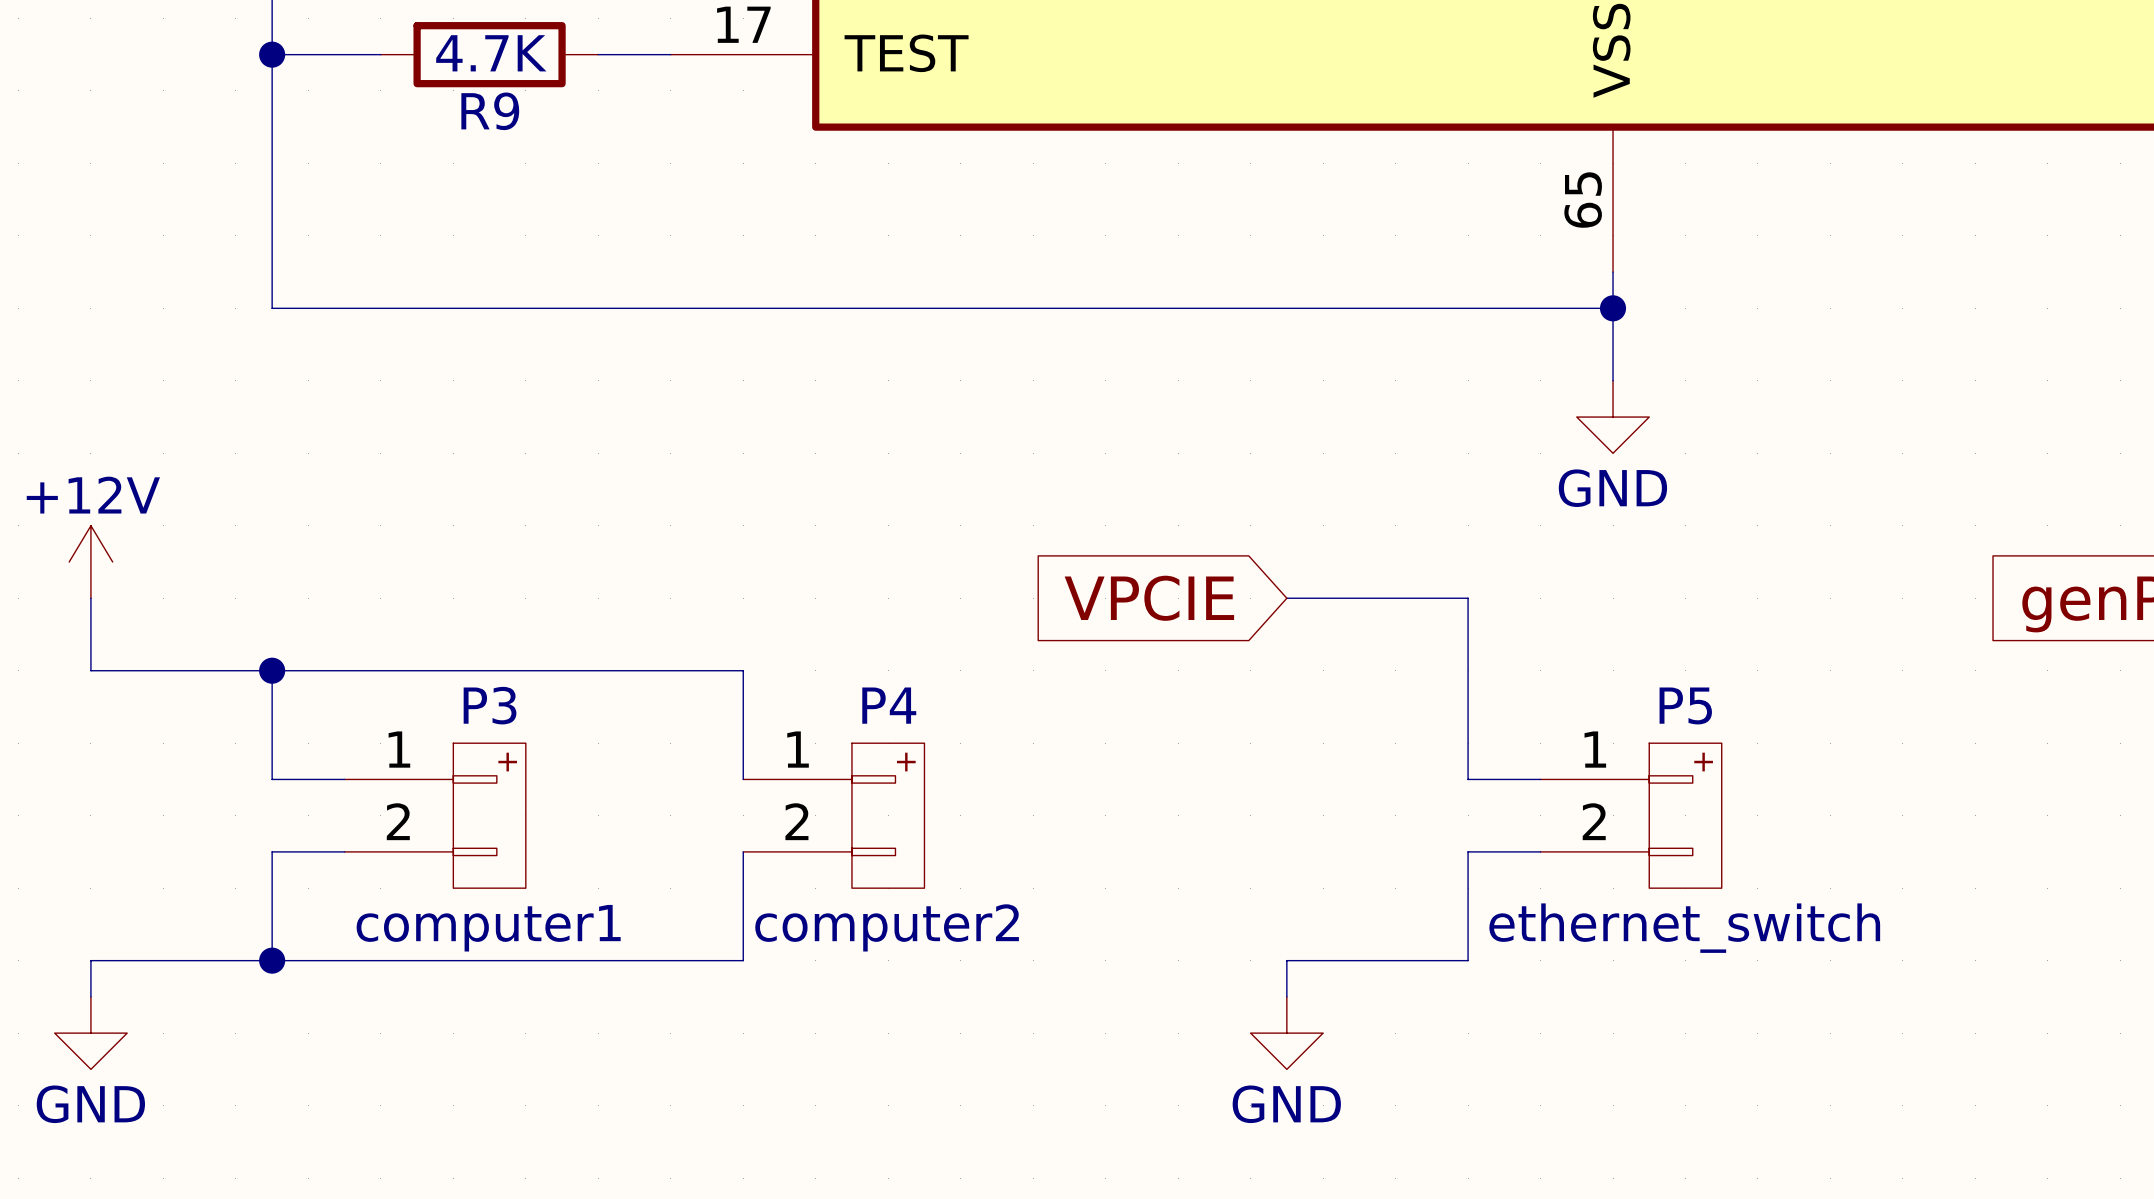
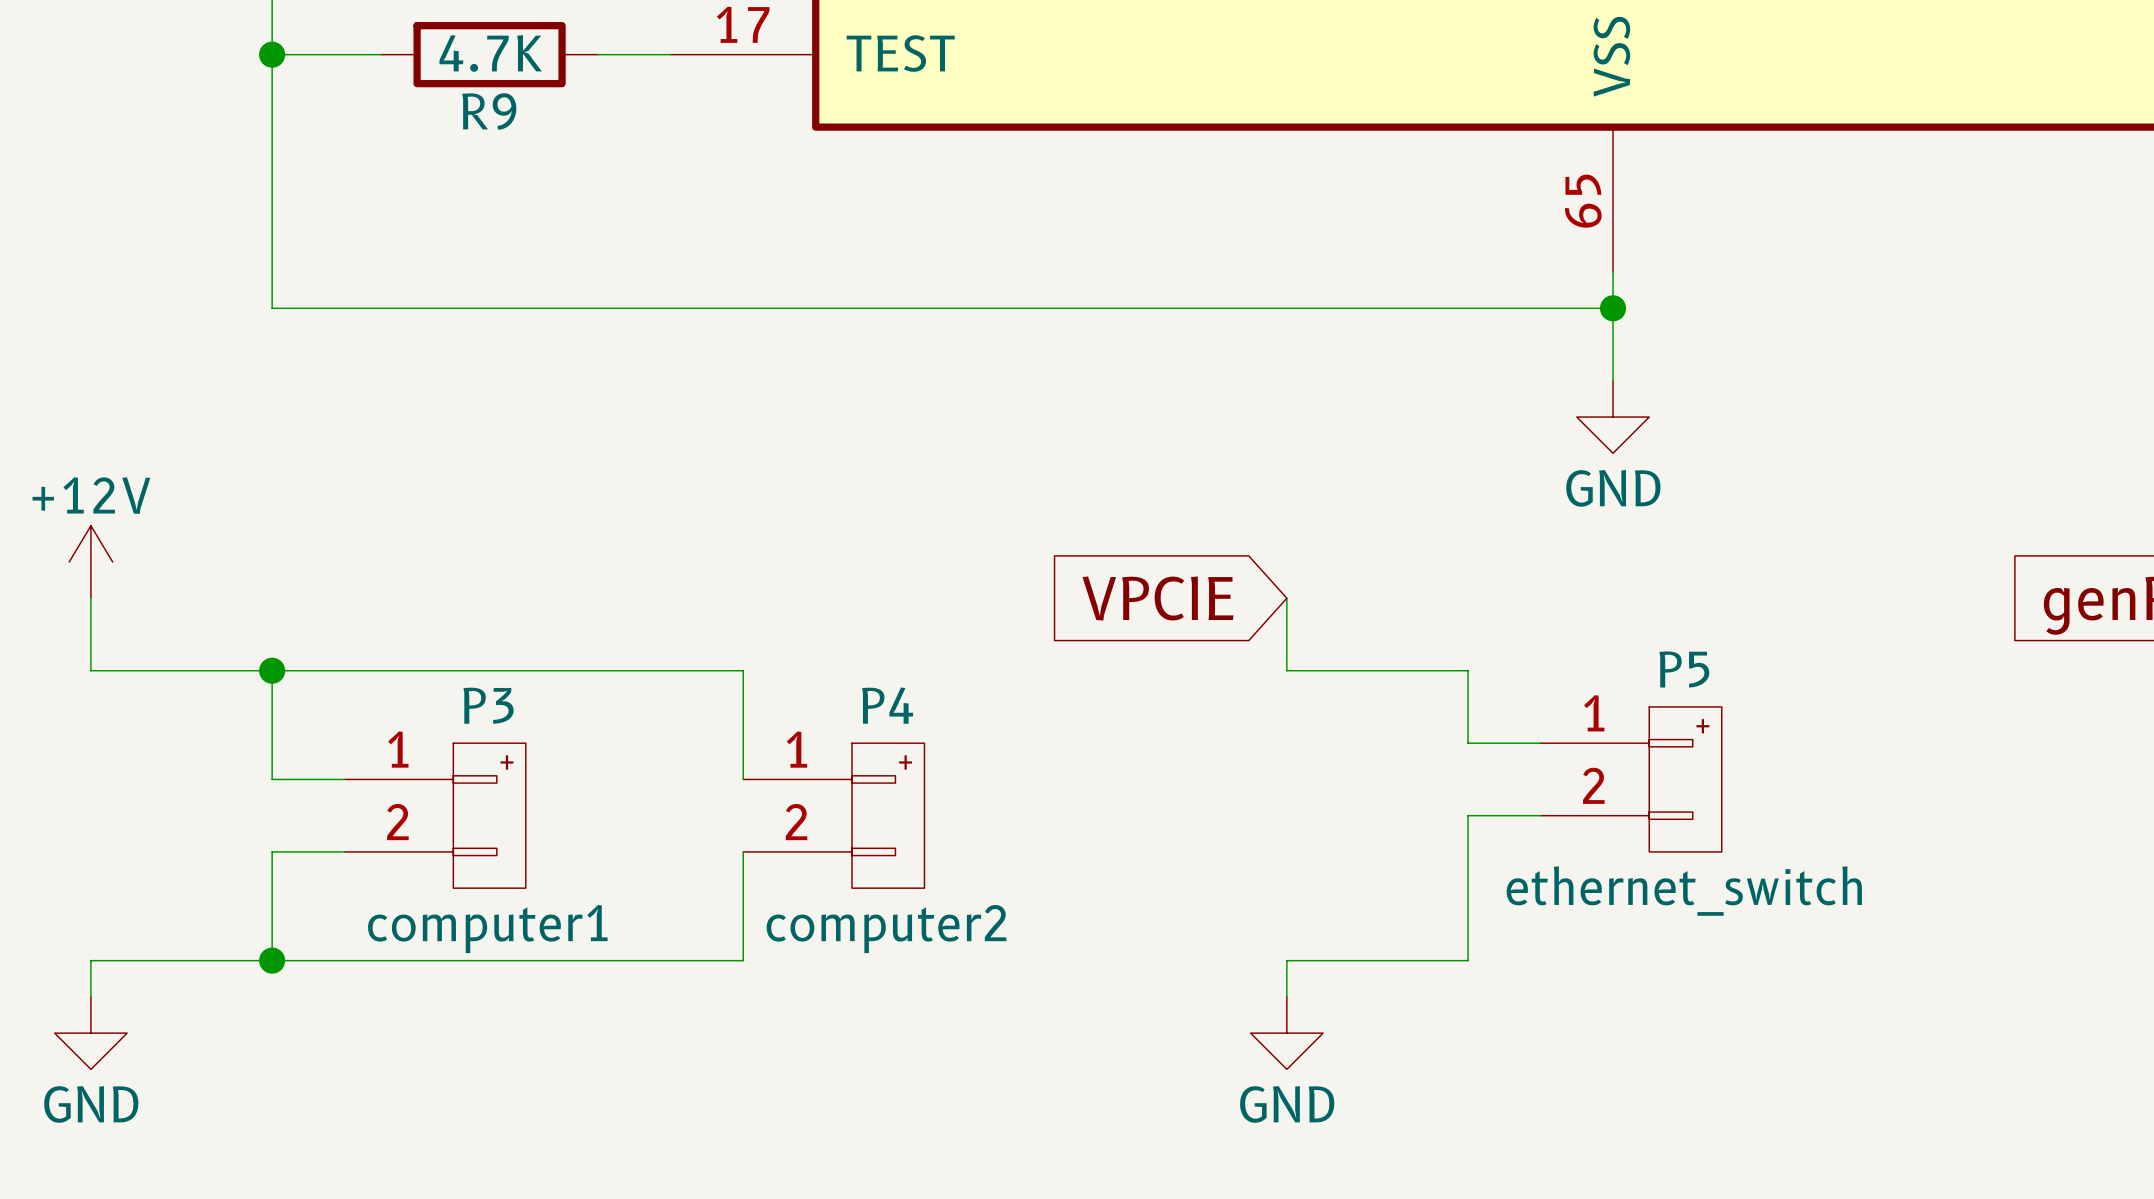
wire: (1286, 598) (1468, 598) (1468, 670) -> (1286, 598) (1286, 670) (1468, 670)
wire: (1468, 743) (1468, 779) (1540, 779) -> (1468, 743) (1540, 743)
P5 position: (1631, 815) -> (1631, 779)
wire: (1468, 851) (1540, 851) -> (1468, 851) (1468, 815) (1540, 815)

